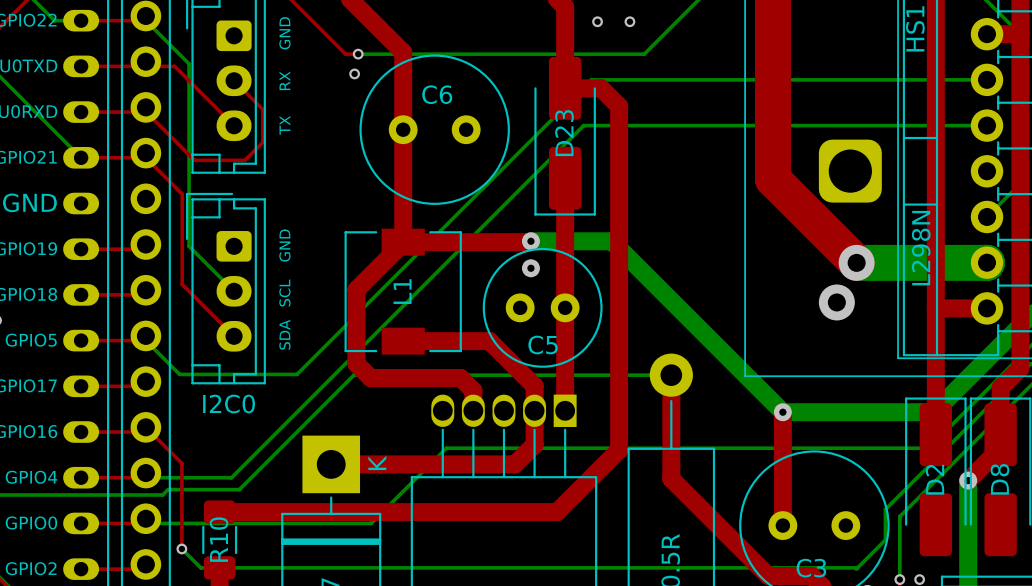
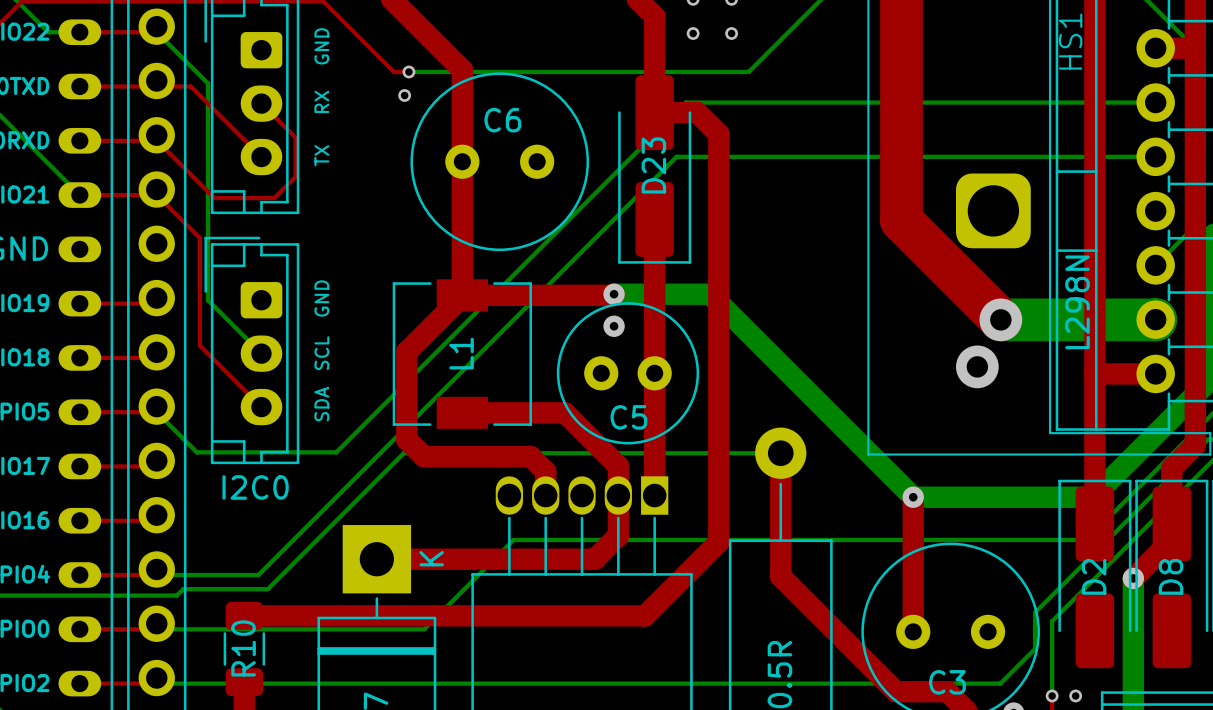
top track: (145, 427) (181, 463) (181, 548) -> none
bottom track: (181, 548) (200, 567) (857, 567) -> none
via: (181, 548) -> none
bottom track: none -> (156, 683) (1000, 683)

